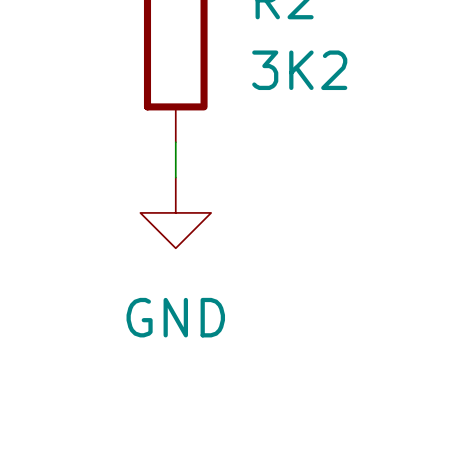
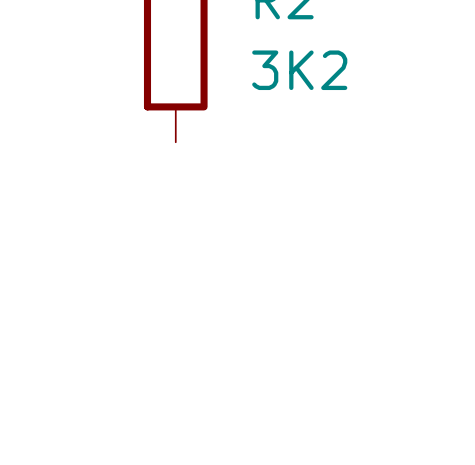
wire: (175, 142) (175, 177) -> none
power symbol: GND (175, 212) -> none

